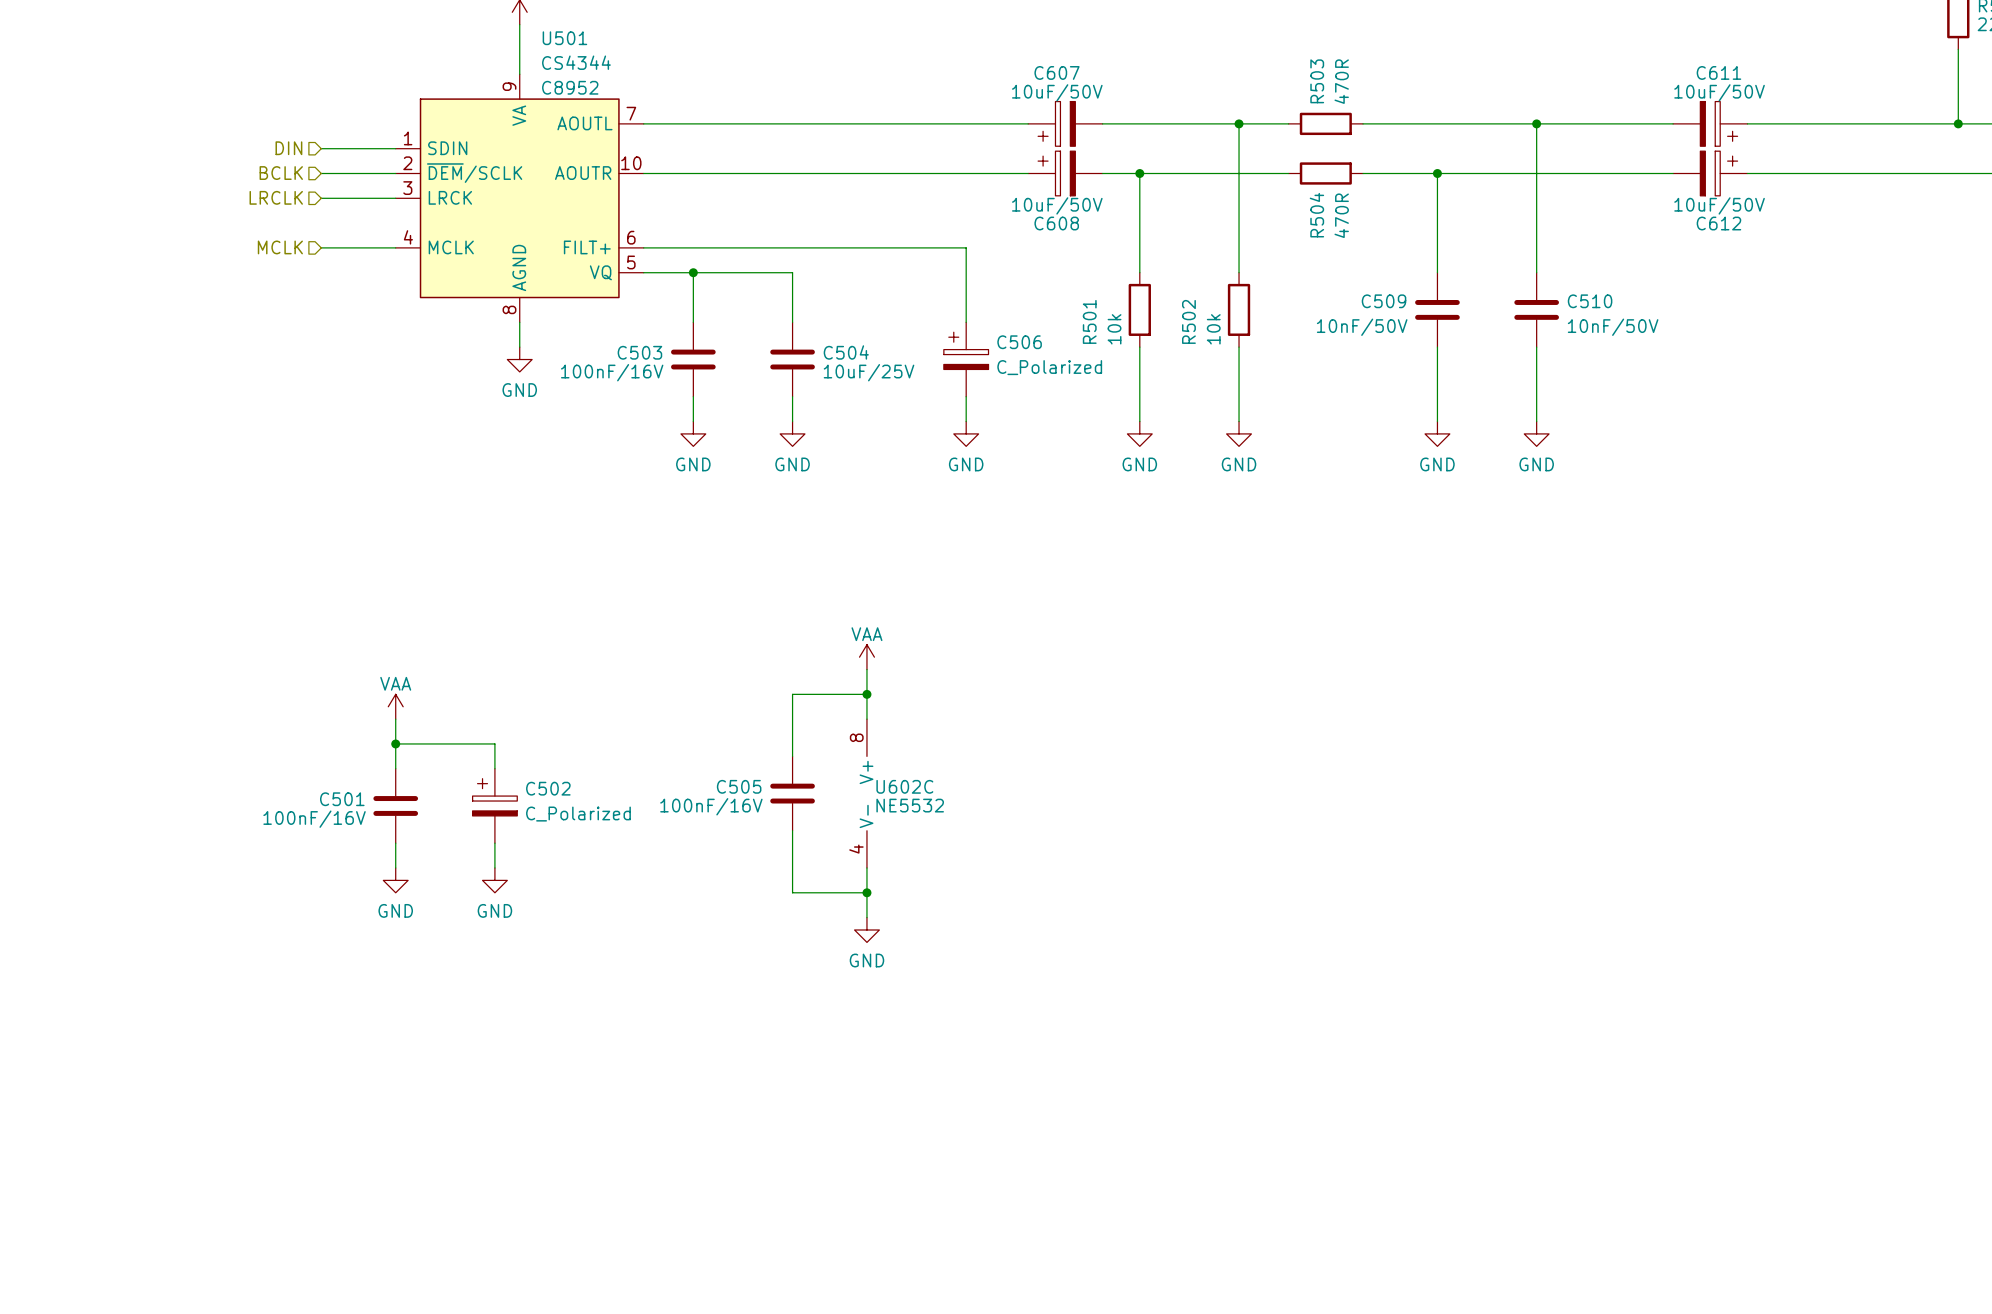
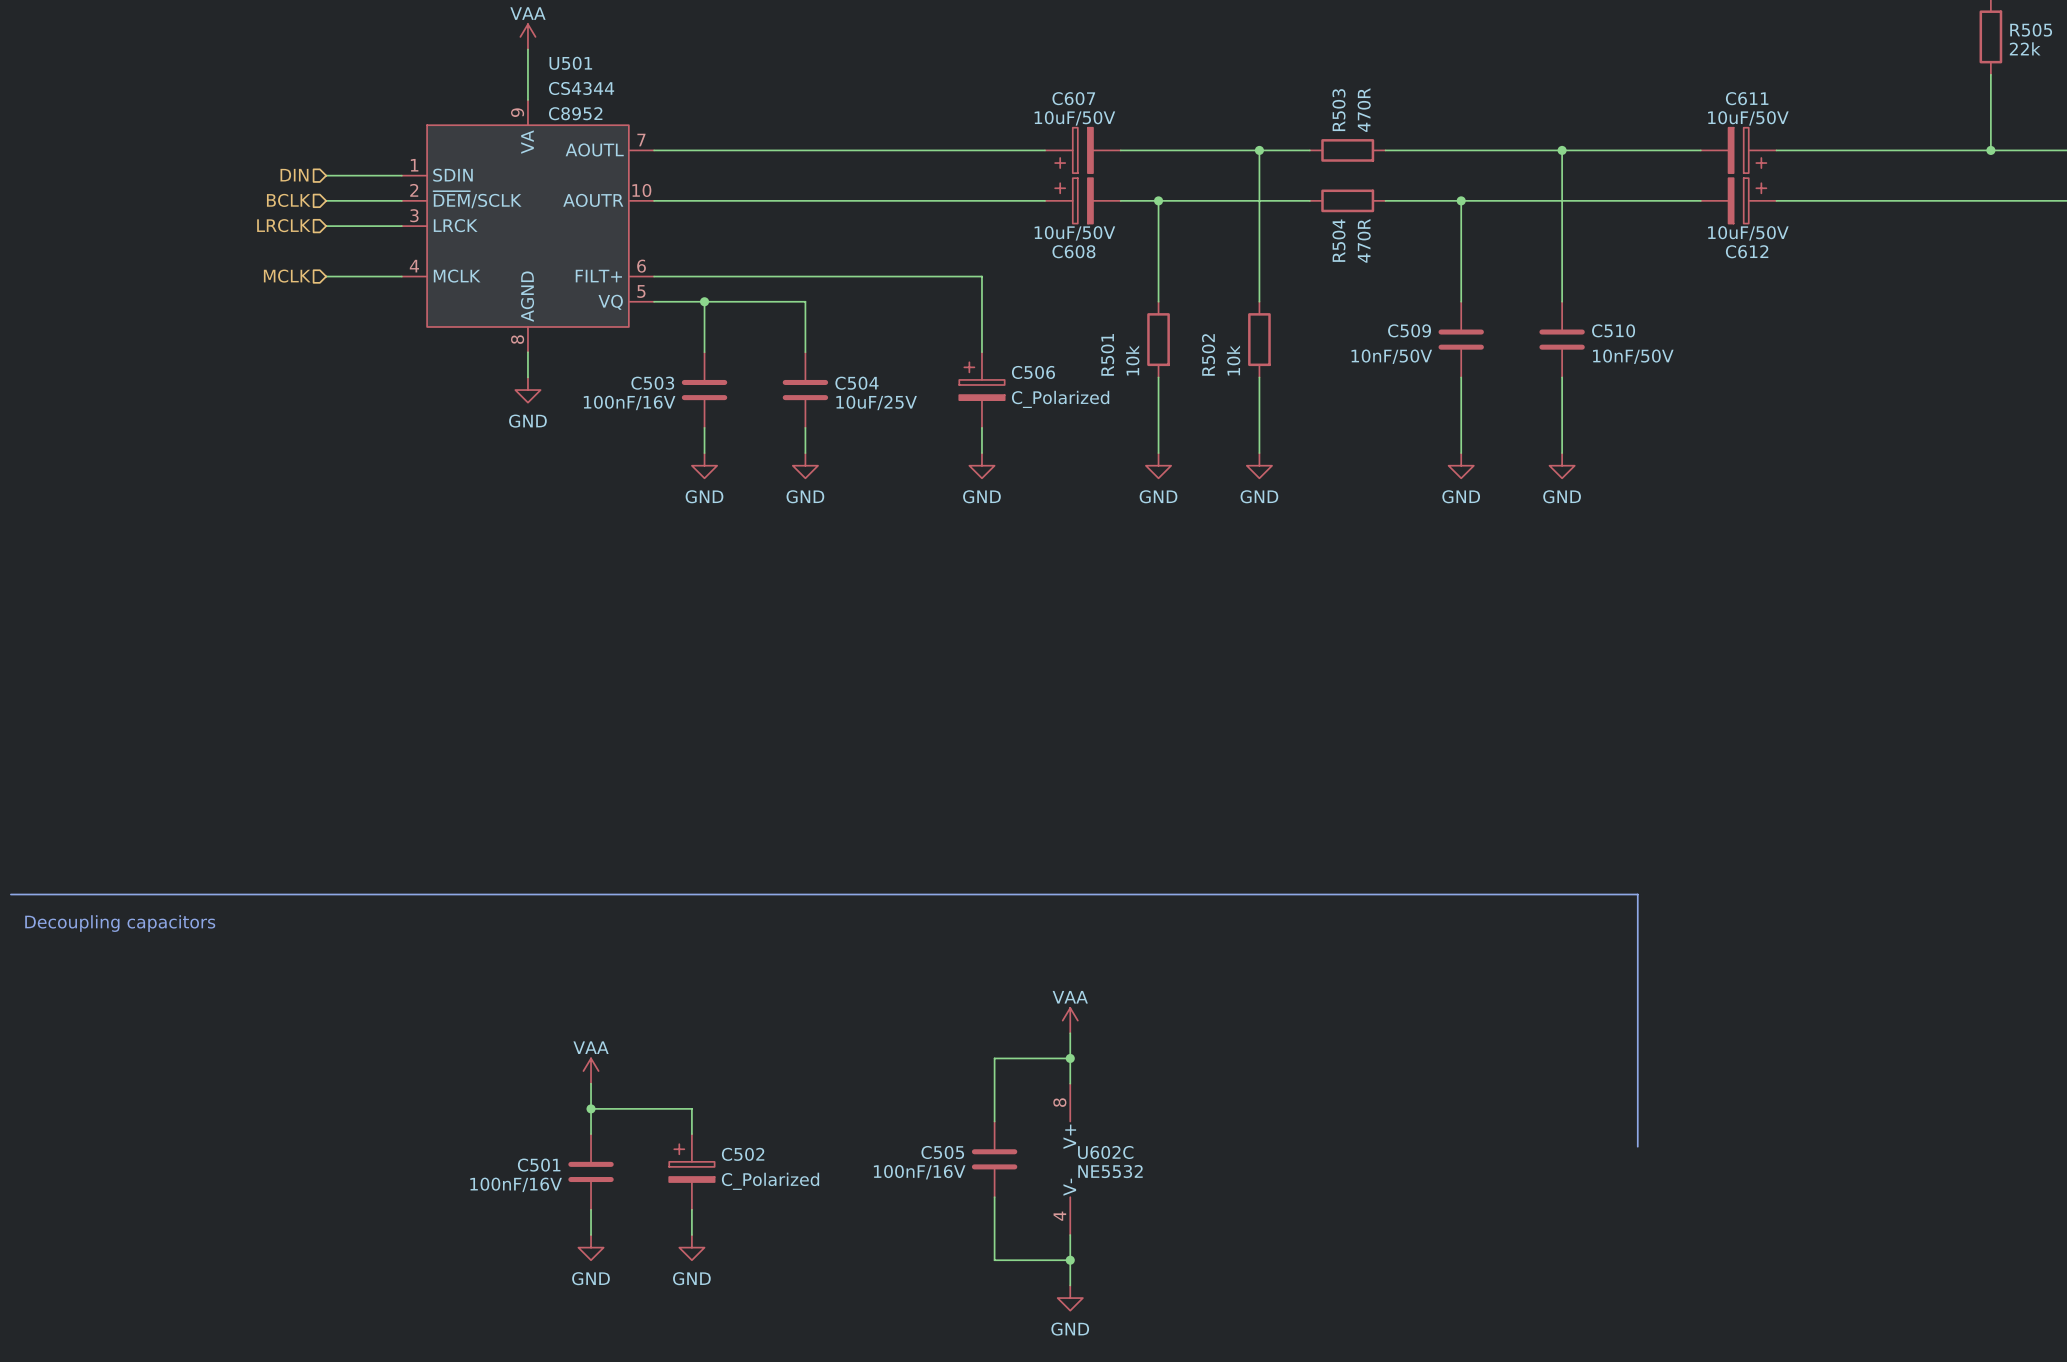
power symbol: VAA (866, 657) -> none
wire: (866, 669) (866, 719) -> none
wire: (866, 694) (792, 694) (792, 756) -> none
junction: (866, 694) -> none
power symbol: VAA (395, 706) -> none
wire: (395, 719) (395, 768) -> none
wire: (395, 743) (494, 743) (494, 768) -> none
junction: (395, 743) -> none
C505 position: (792, 793) -> (994, 1159)
U602C position: (866, 793) -> (1070, 1159)
C501 position: (395, 805) -> (591, 1171)
C502 position: (494, 805) -> (691, 1171)
wire: (792, 830) (792, 892) (866, 892) -> none
wire: (395, 843) (395, 867) -> none
wire: (494, 843) (494, 867) -> none
line: none -> (10, 894) (1637, 894) (1637, 1146)
wire: (866, 867) (866, 917) -> (1070, 1033) (1070, 1083)
power symbol: GND (395, 880) -> none
power symbol: GND (494, 880) -> none
text: none -> Decoupling capacitors (120, 923)
junction: (866, 892) -> none
power symbol: GND (866, 929) -> none
power symbol: none -> VAA (1070, 1020)
wire: none -> (1070, 1058) (994, 1058) (994, 1121)
junction: none -> (1070, 1058)
power symbol: none -> VAA (591, 1071)
wire: none -> (591, 1083) (591, 1134)
wire: none -> (591, 1108) (691, 1108) (691, 1134)
junction: none -> (591, 1108)
wire: none -> (994, 1197) (994, 1260) (1070, 1260)
wire: none -> (591, 1209) (591, 1235)
wire: none -> (691, 1209) (691, 1235)
wire: none -> (1070, 1235) (1070, 1285)
power symbol: none -> GND (591, 1247)
power symbol: none -> GND (691, 1247)
junction: none -> (1070, 1260)
power symbol: none -> GND (1070, 1298)

